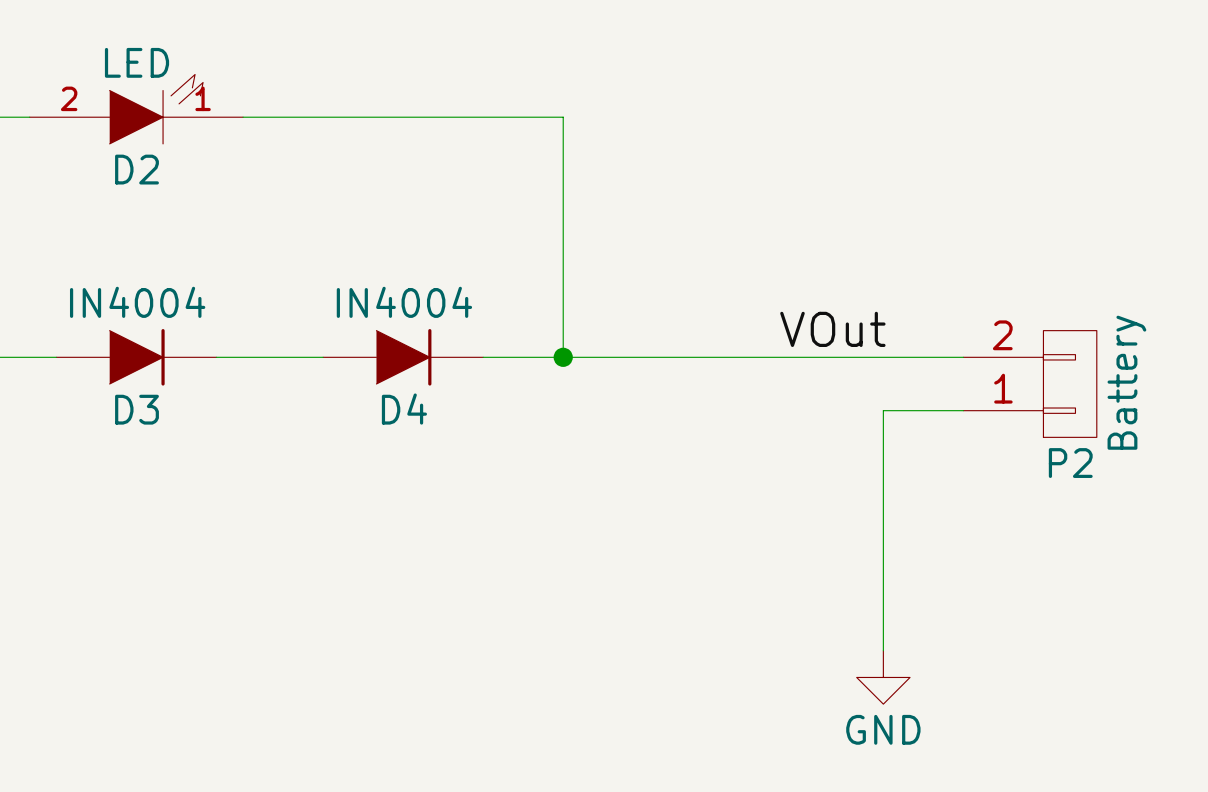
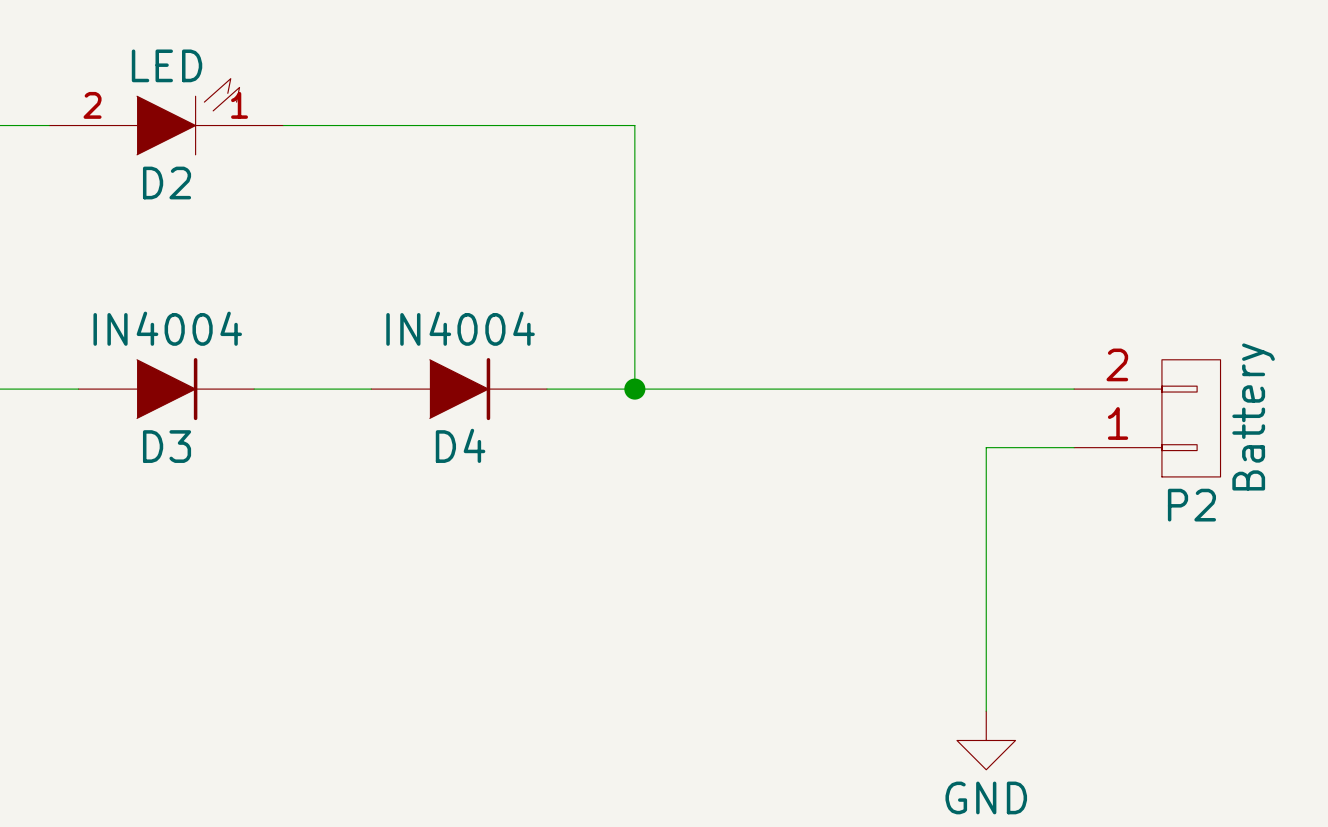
label: VOut (832, 329) -> none

